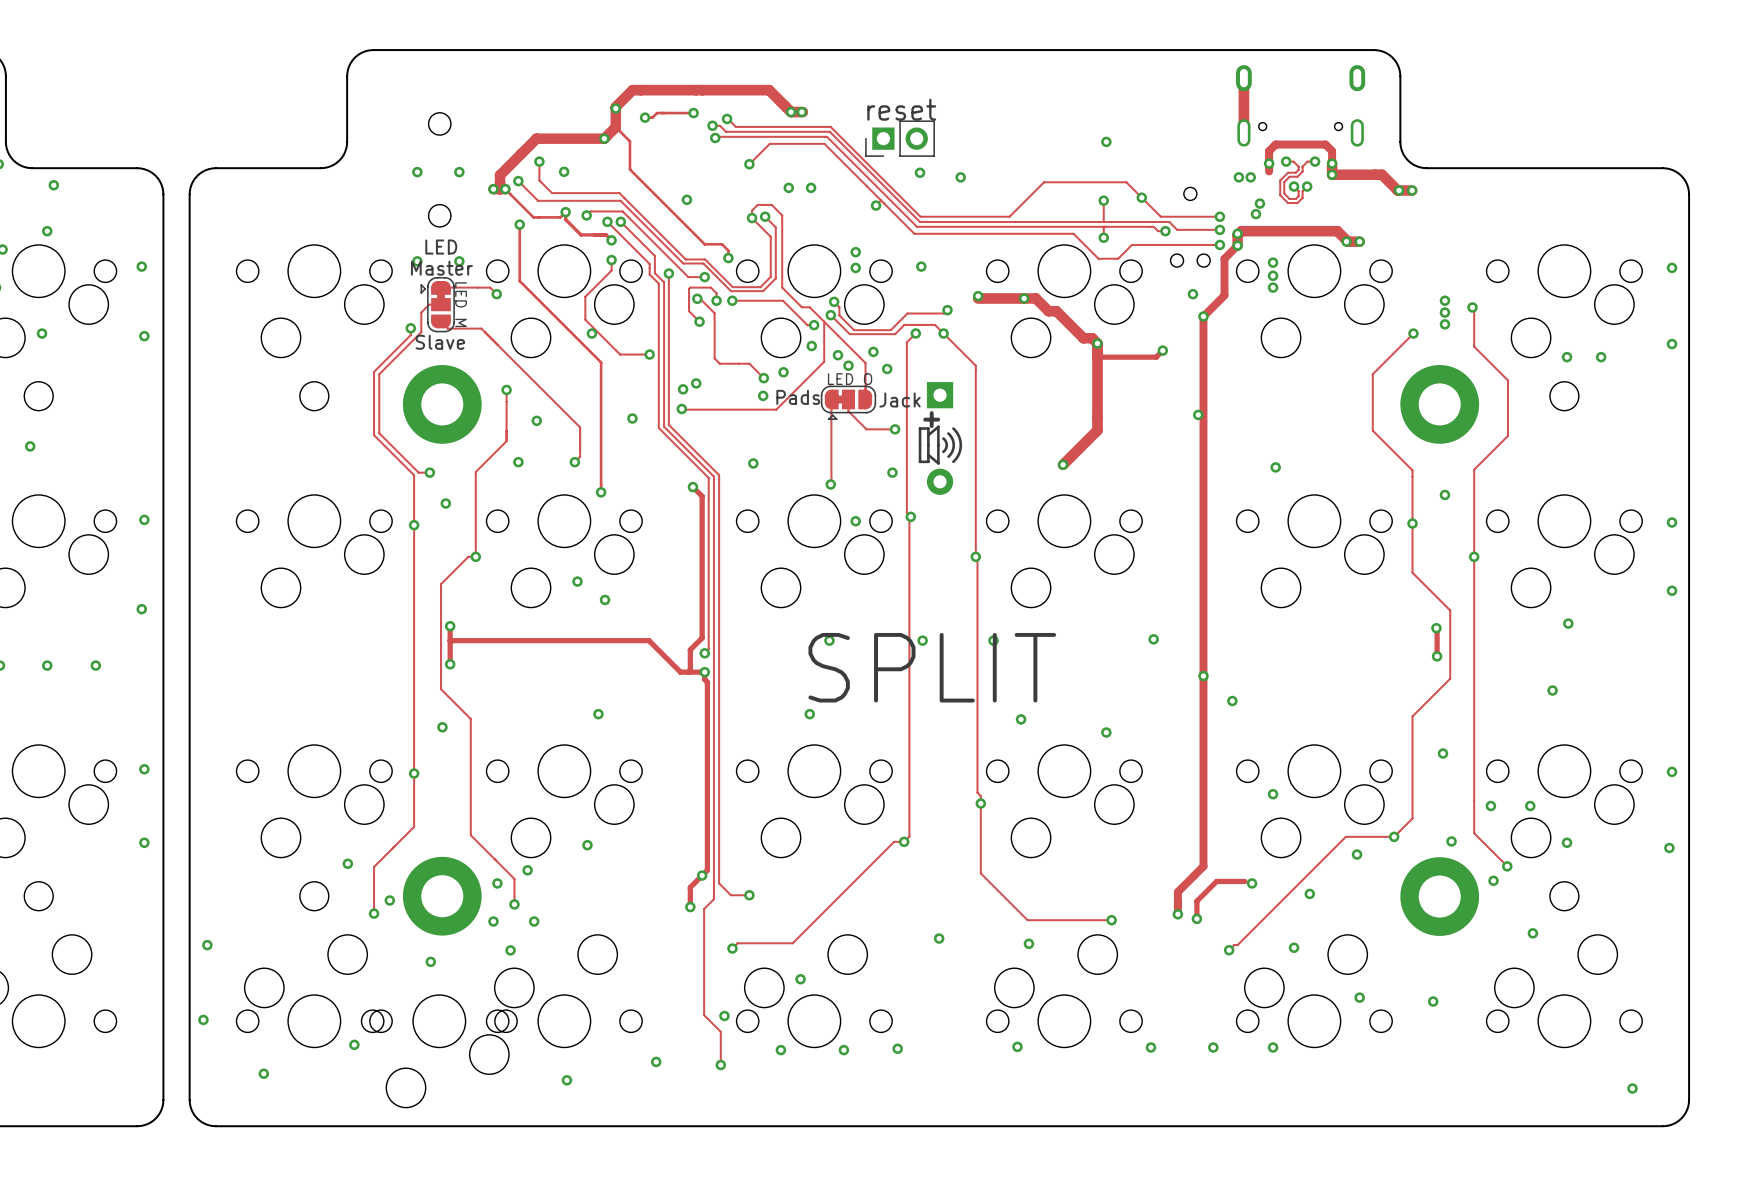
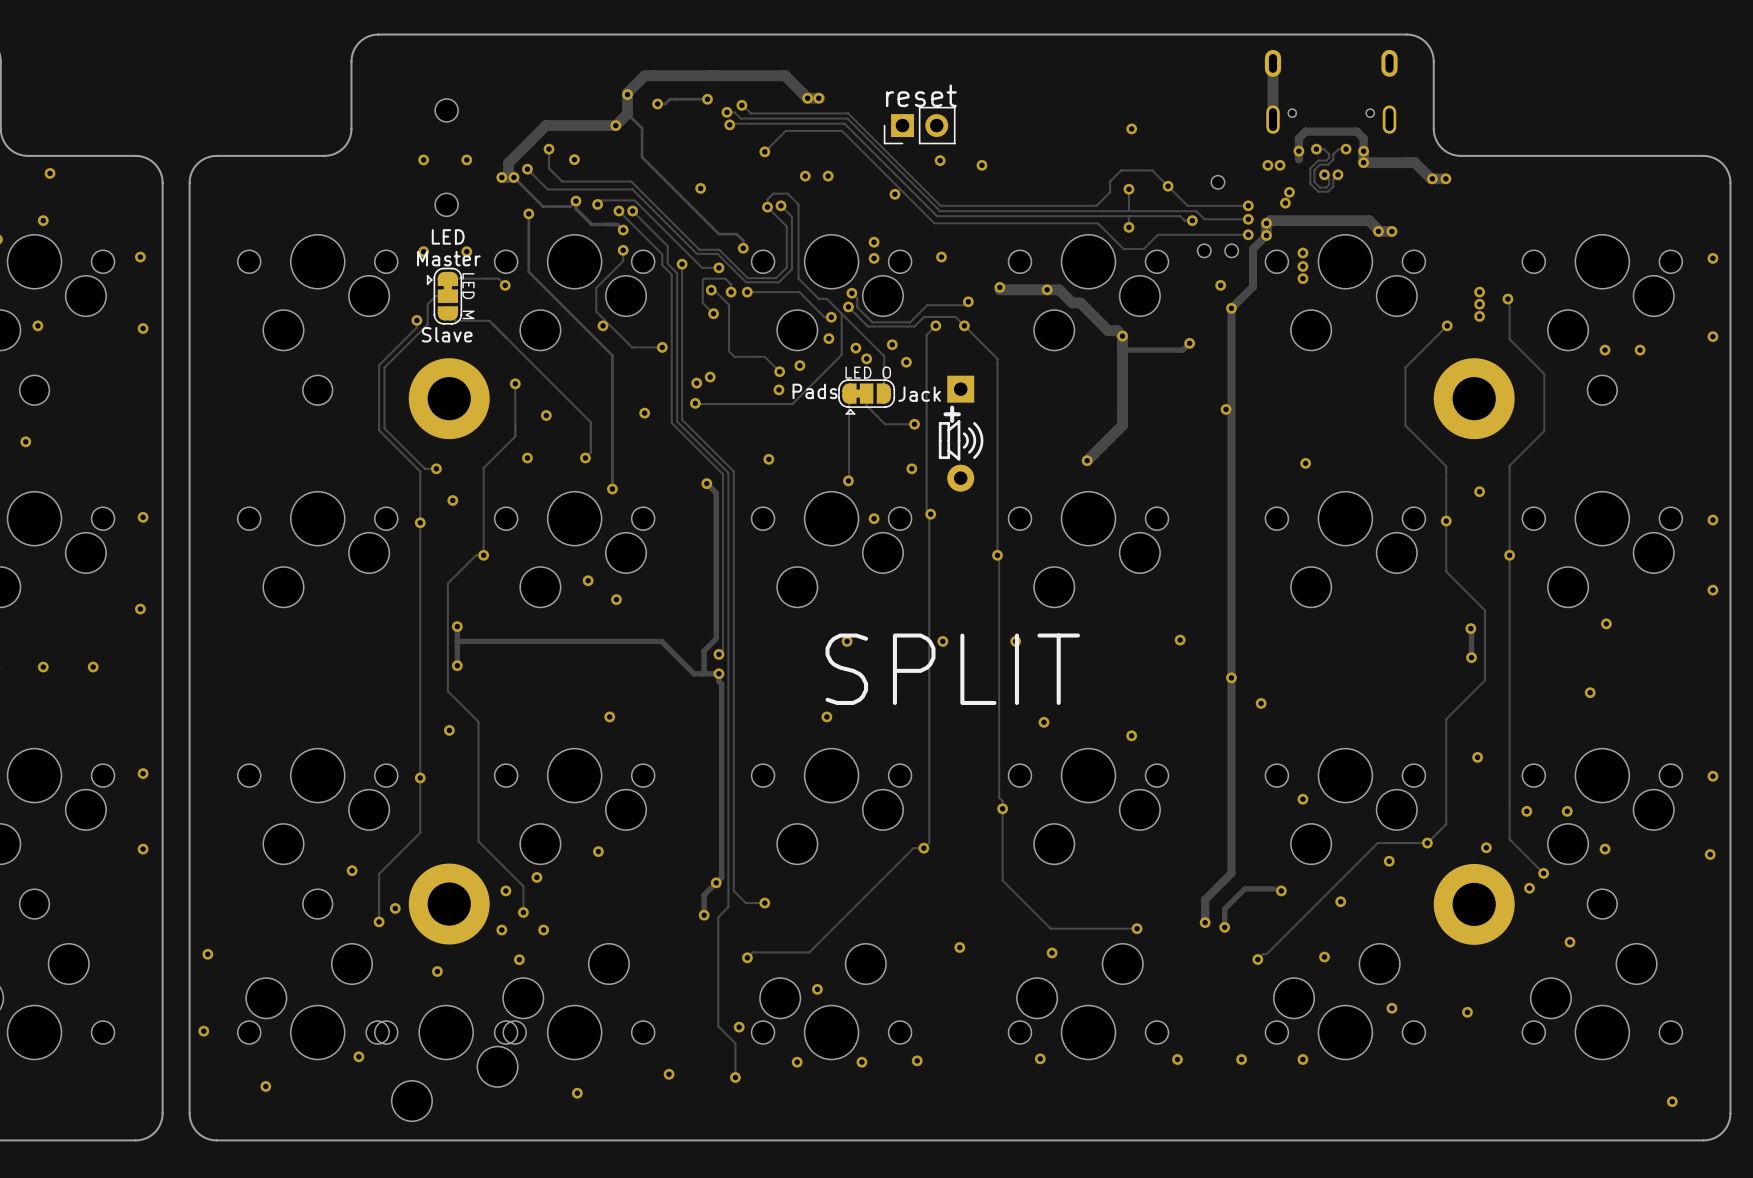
track: (1096, 182) (1044, 182) (1009, 216) -> (1121, 170) (1110, 181) (1110, 192) (1096, 205) (1032, 205)

